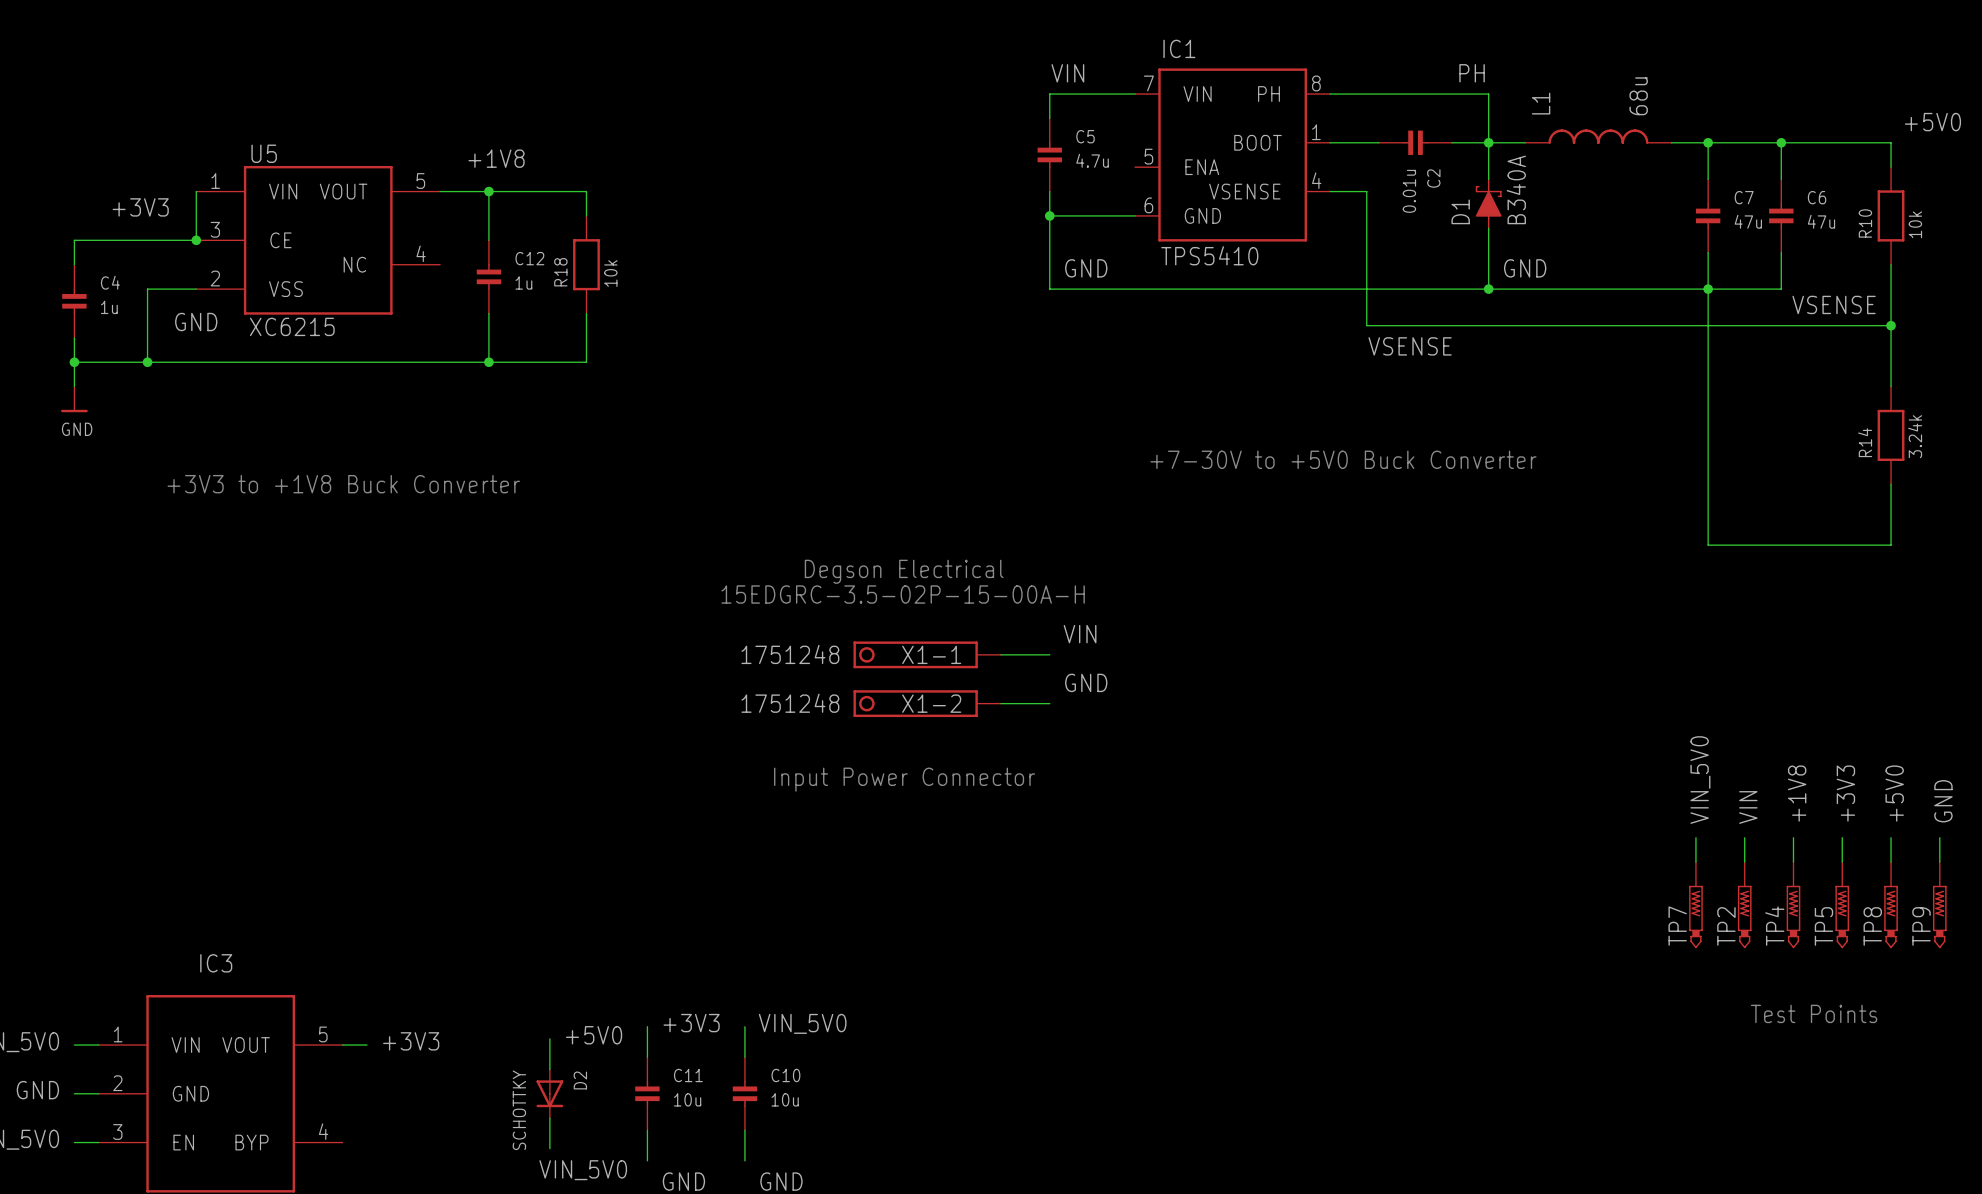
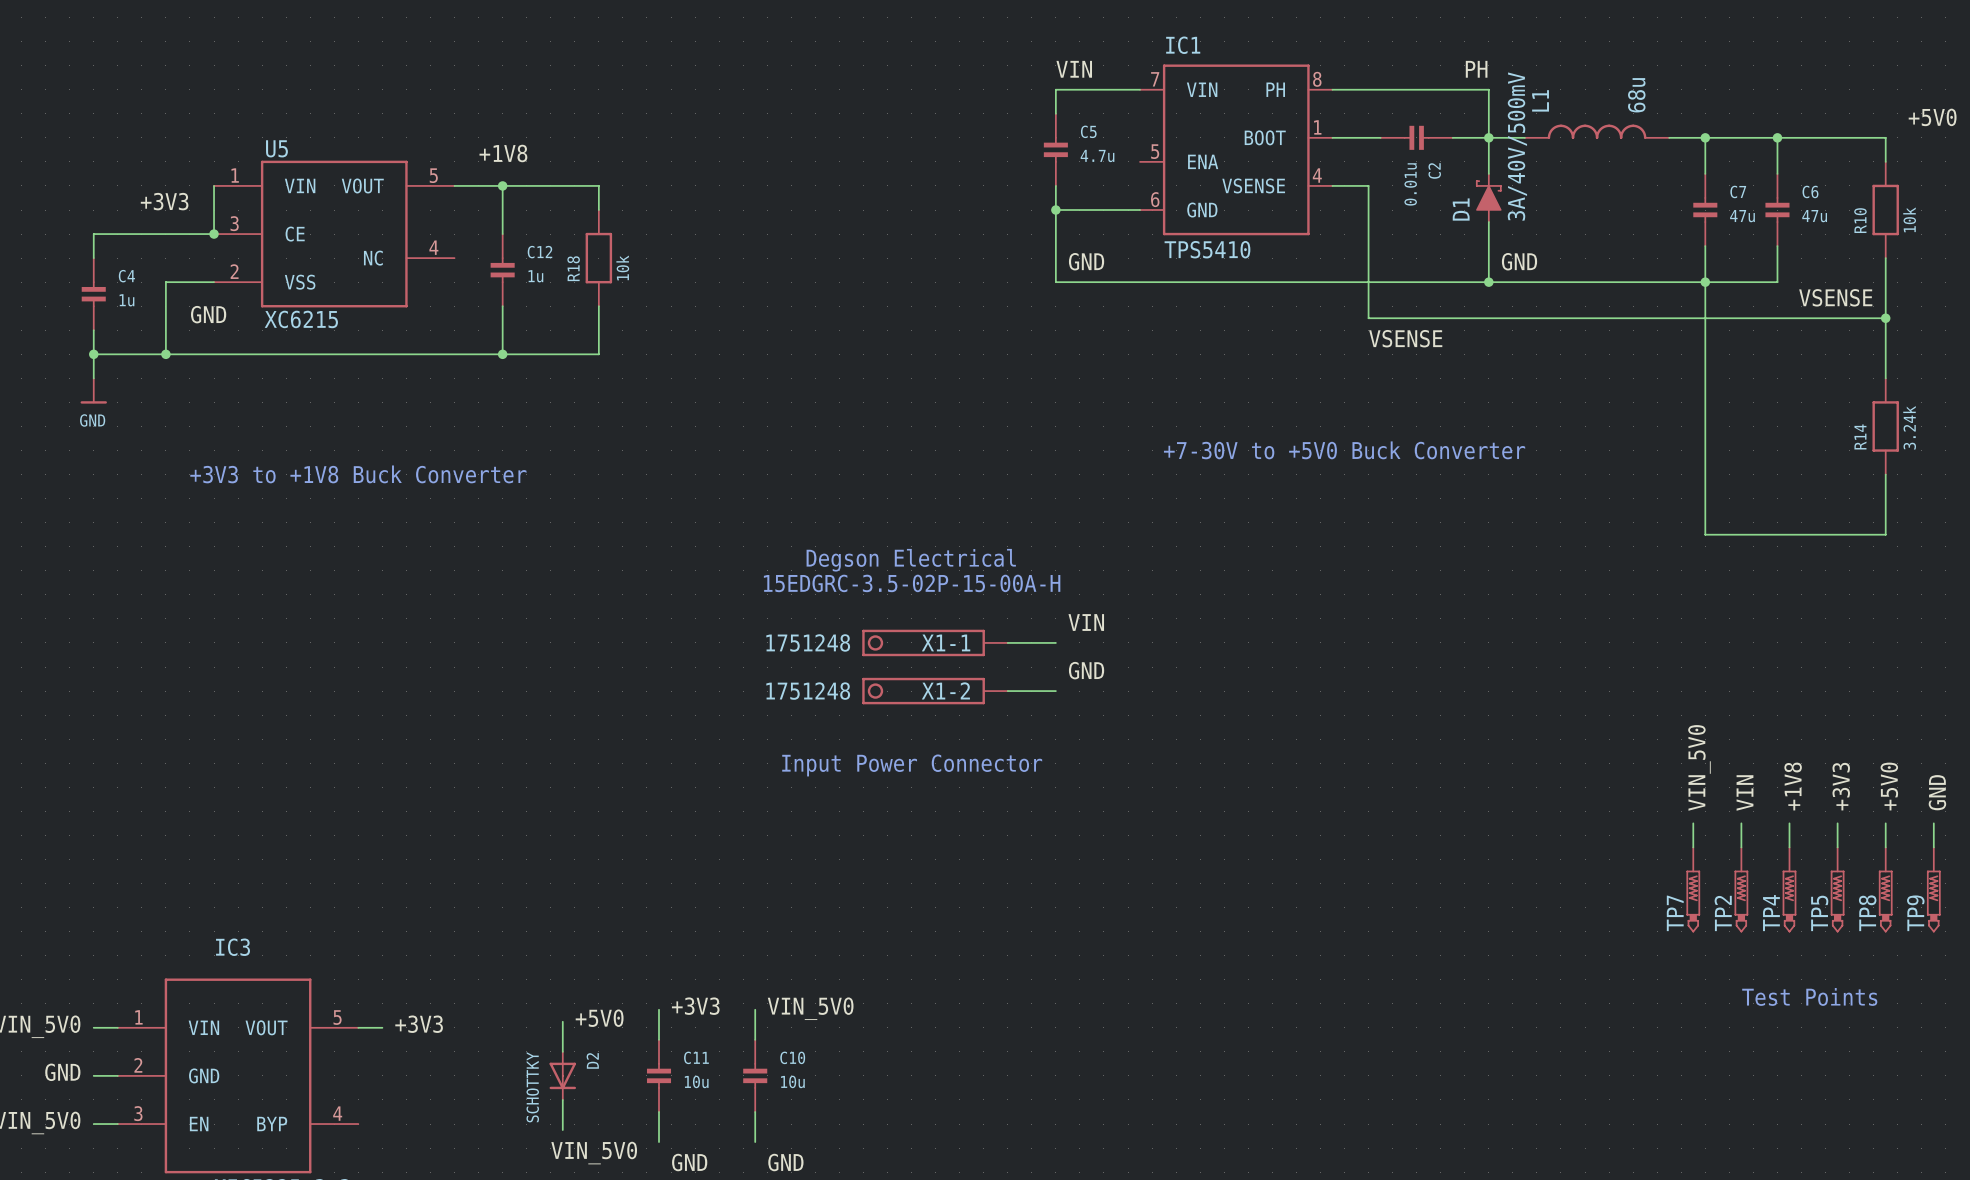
D1 value: B340A (1516, 189) -> 3A/40V/500mV (1517, 146)

